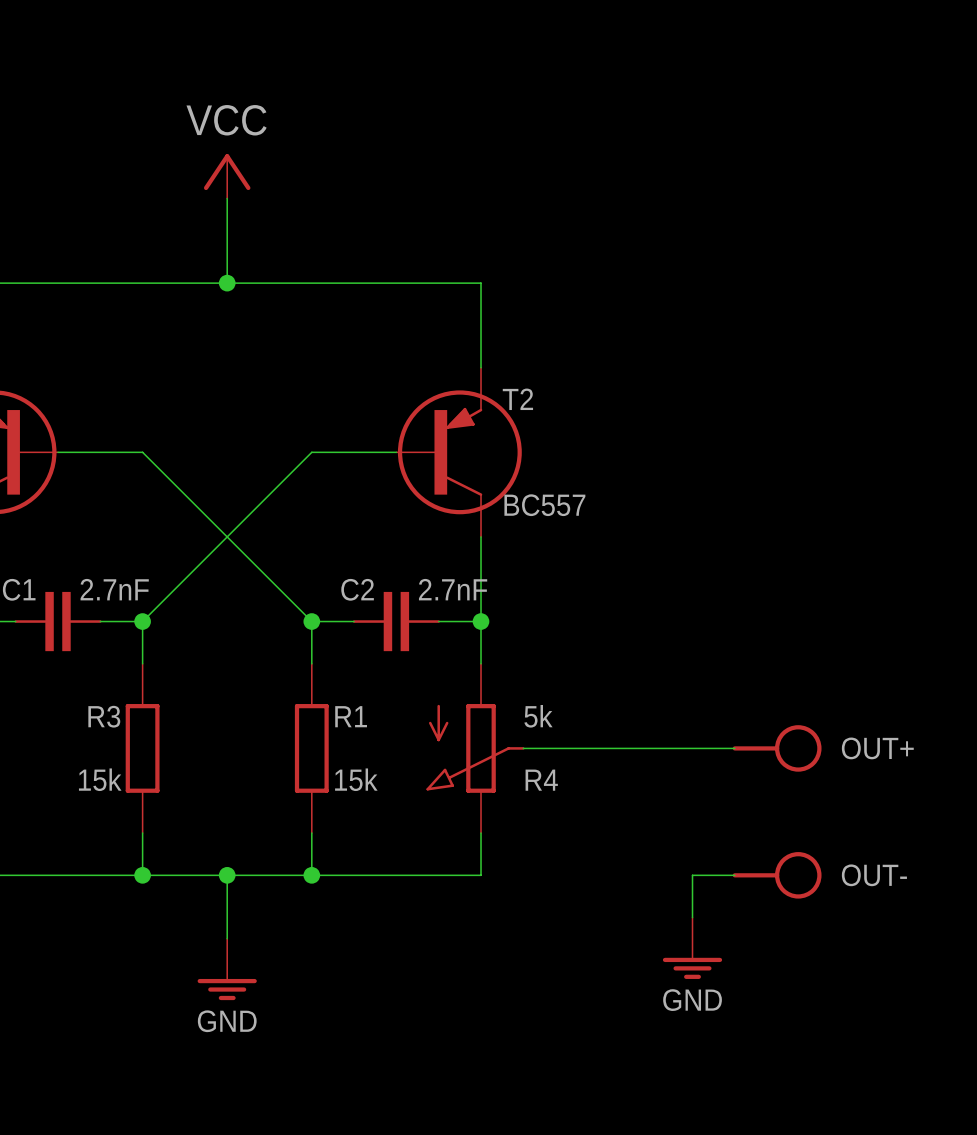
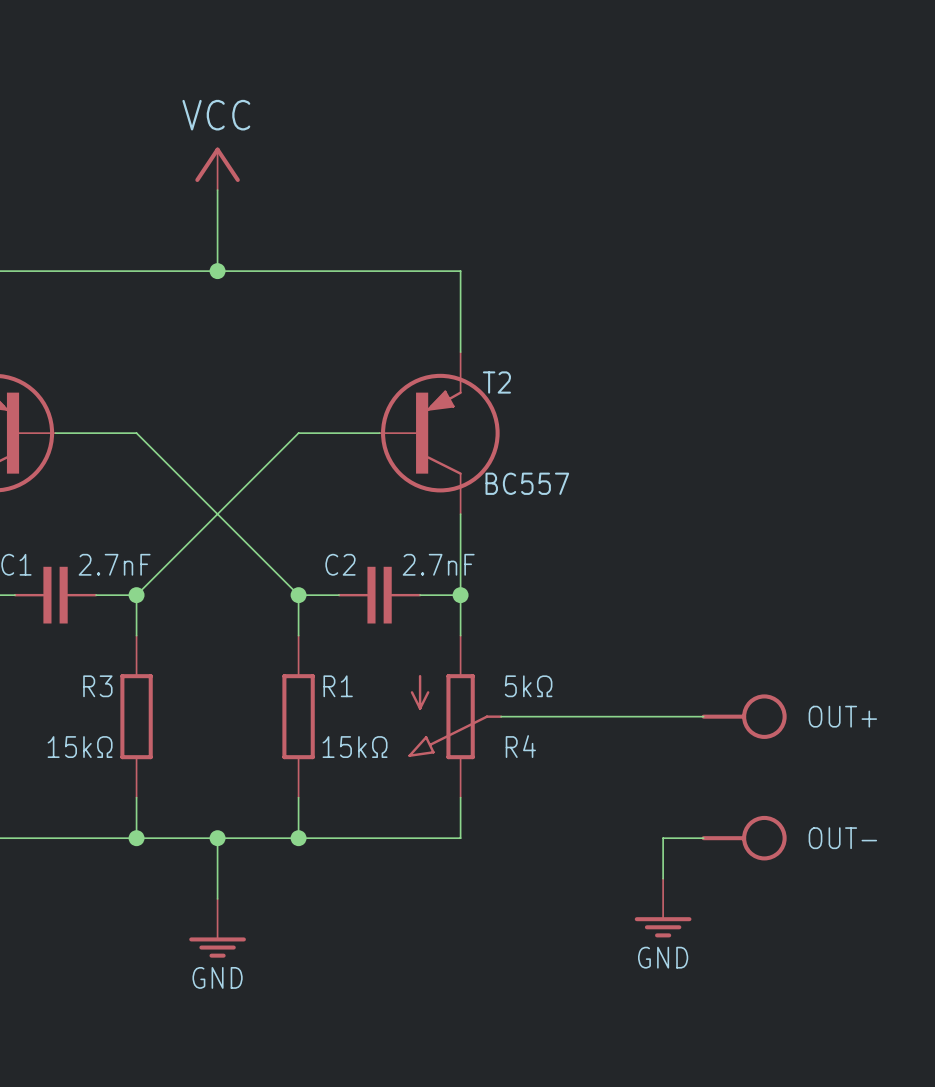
R4 value: 5k (538, 716) -> 5kΩ (528, 686)
R3 value: 15k (100, 779) -> 15kΩ (80, 747)
R1 value: 15k (356, 779) -> 15kΩ (355, 747)

